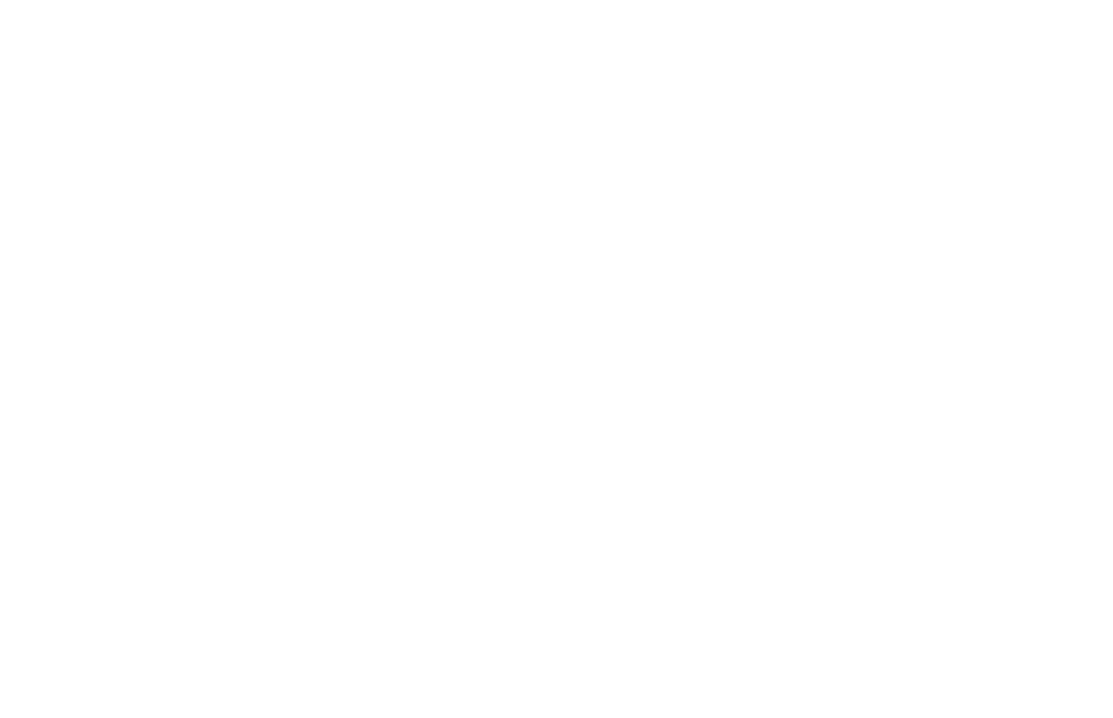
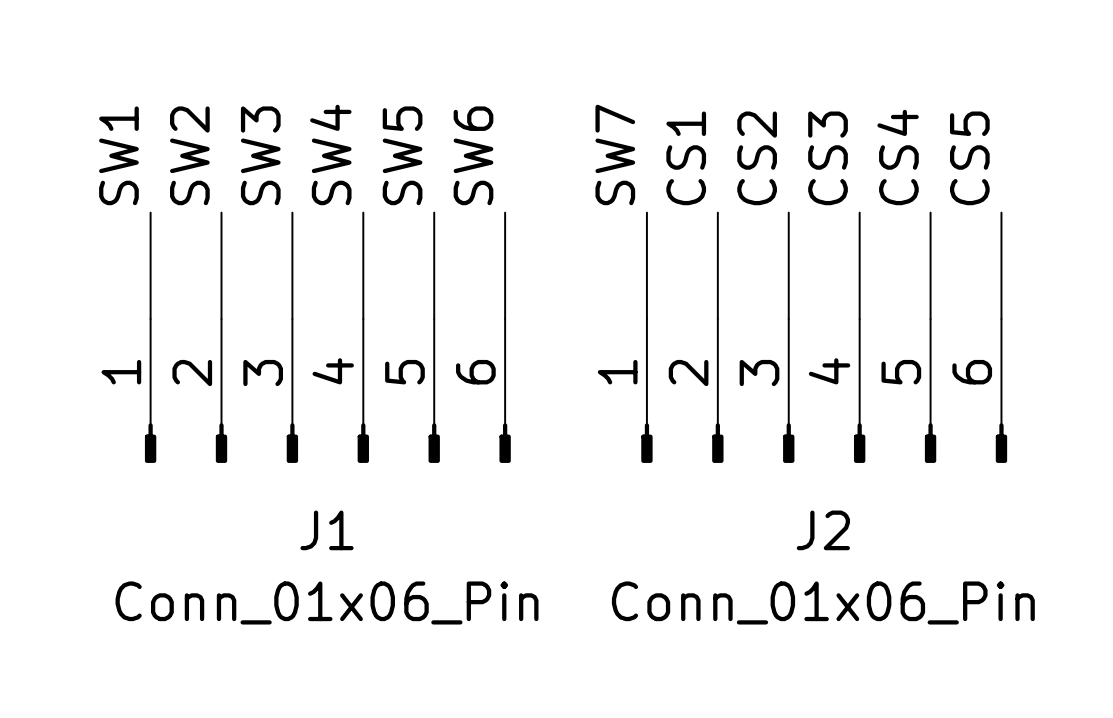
label: none -> SW4 (330, 154)
label: none -> SW7 (615, 154)
label: none -> SW1 (118, 155)
label: none -> SW2 (189, 155)
label: none -> SW3 (260, 155)
label: none -> SW5 (402, 155)
label: none -> SW6 (473, 155)
label: none -> CS4 (898, 157)
label: none -> CS1 (686, 158)
label: none -> CS2 (757, 158)
label: none -> CS3 (828, 158)
label: none -> CS5 (969, 158)
wire: none -> (150, 212) (150, 319)
wire: none -> (221, 212) (221, 319)
wire: none -> (292, 212) (292, 319)
wire: none -> (363, 212) (363, 319)
wire: none -> (434, 212) (434, 319)
wire: none -> (505, 212) (505, 319)
wire: none -> (646, 212) (646, 319)
wire: none -> (717, 212) (717, 319)
wire: none -> (788, 212) (788, 319)
wire: none -> (859, 212) (859, 319)
wire: none -> (930, 212) (930, 319)
wire: none -> (1001, 212) (1001, 319)
J1: none -> Conn_01x06_Pin (327, 390)
J2: none -> Conn_01x06_Pin (824, 390)

